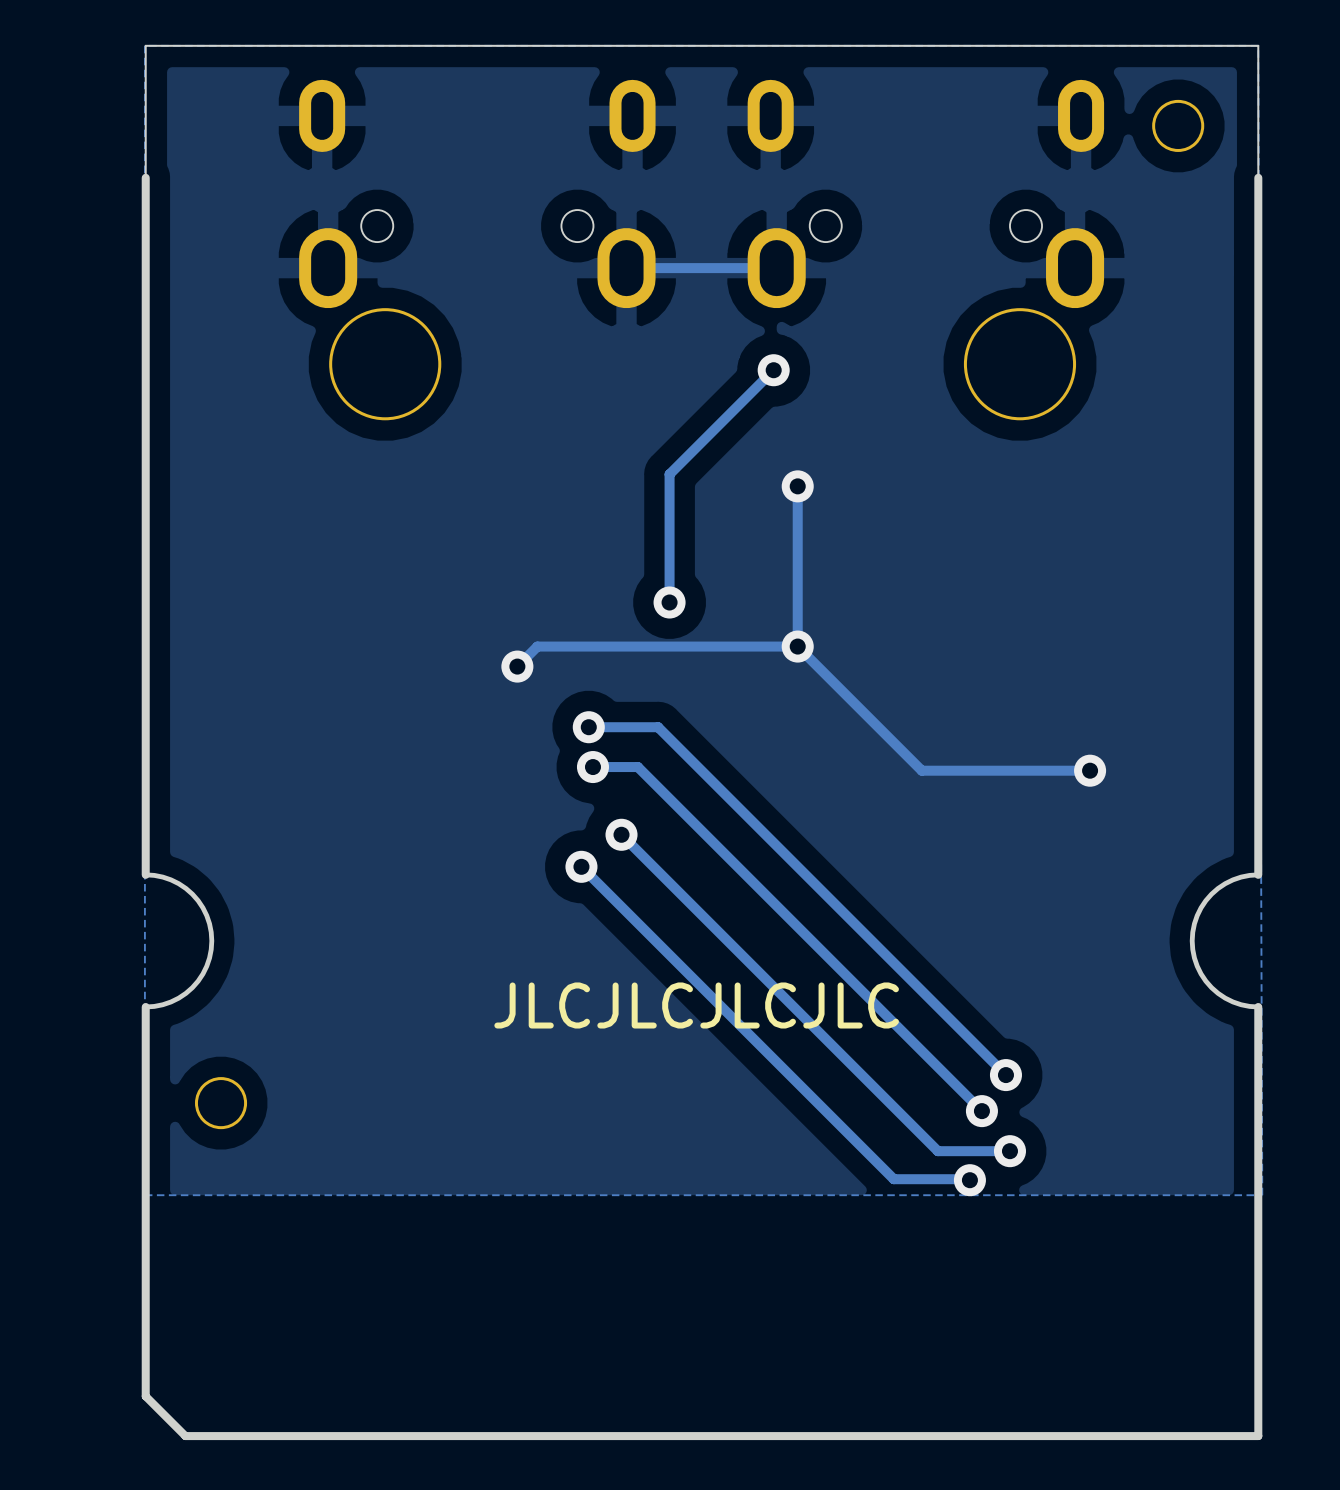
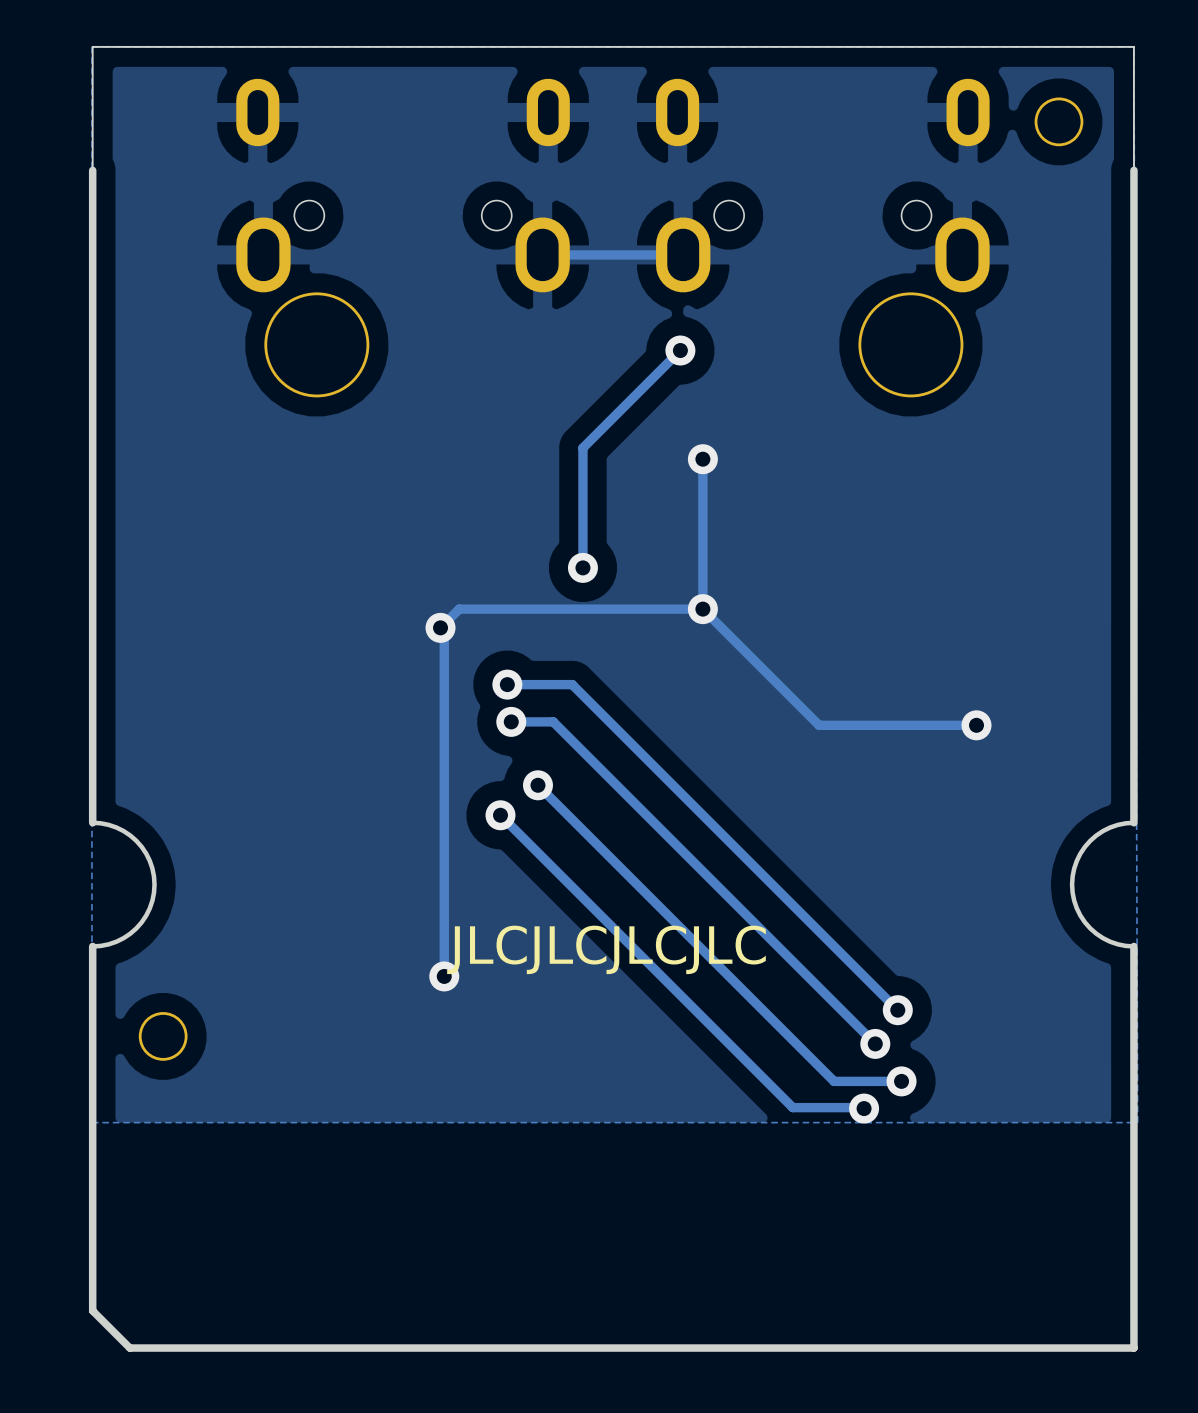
track: none -> (440, 627) (444, 631) (444, 976)
via: none -> (444, 976)

